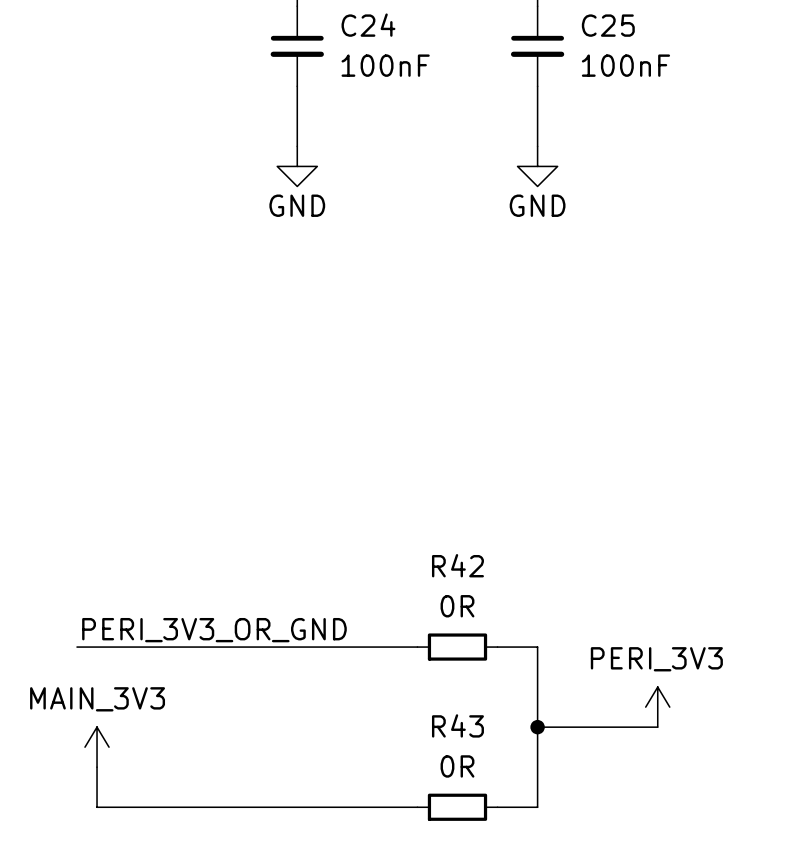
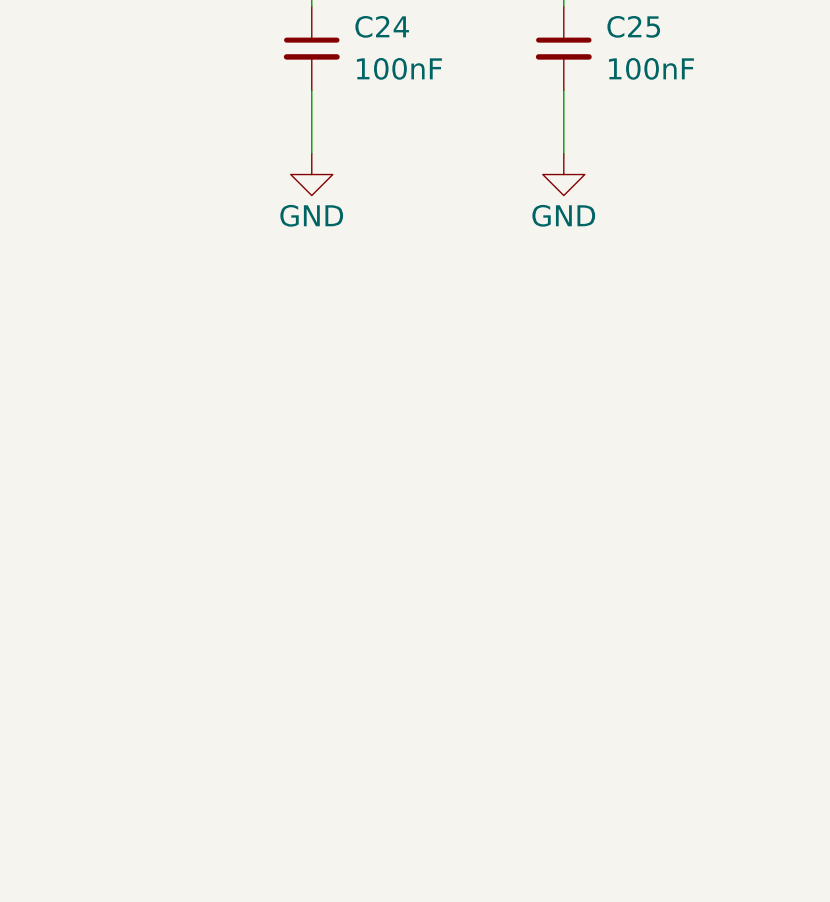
label: PERI_3V3_OR_GND (214, 630) -> none
wire: (76, 647) (417, 647) -> none
R42: 0R (457, 647) -> none
wire: (497, 647) (537, 647) (537, 807) (497, 807) -> none
power symbol: PERI_3V3 (657, 707) -> none
wire: (537, 727) (657, 727) -> none
junction: (537, 727) -> none
power symbol: MAIN_3V3 (97, 747) -> none
wire: (97, 767) (97, 807) (417, 807) -> none
R43: 0R (457, 807) -> none

